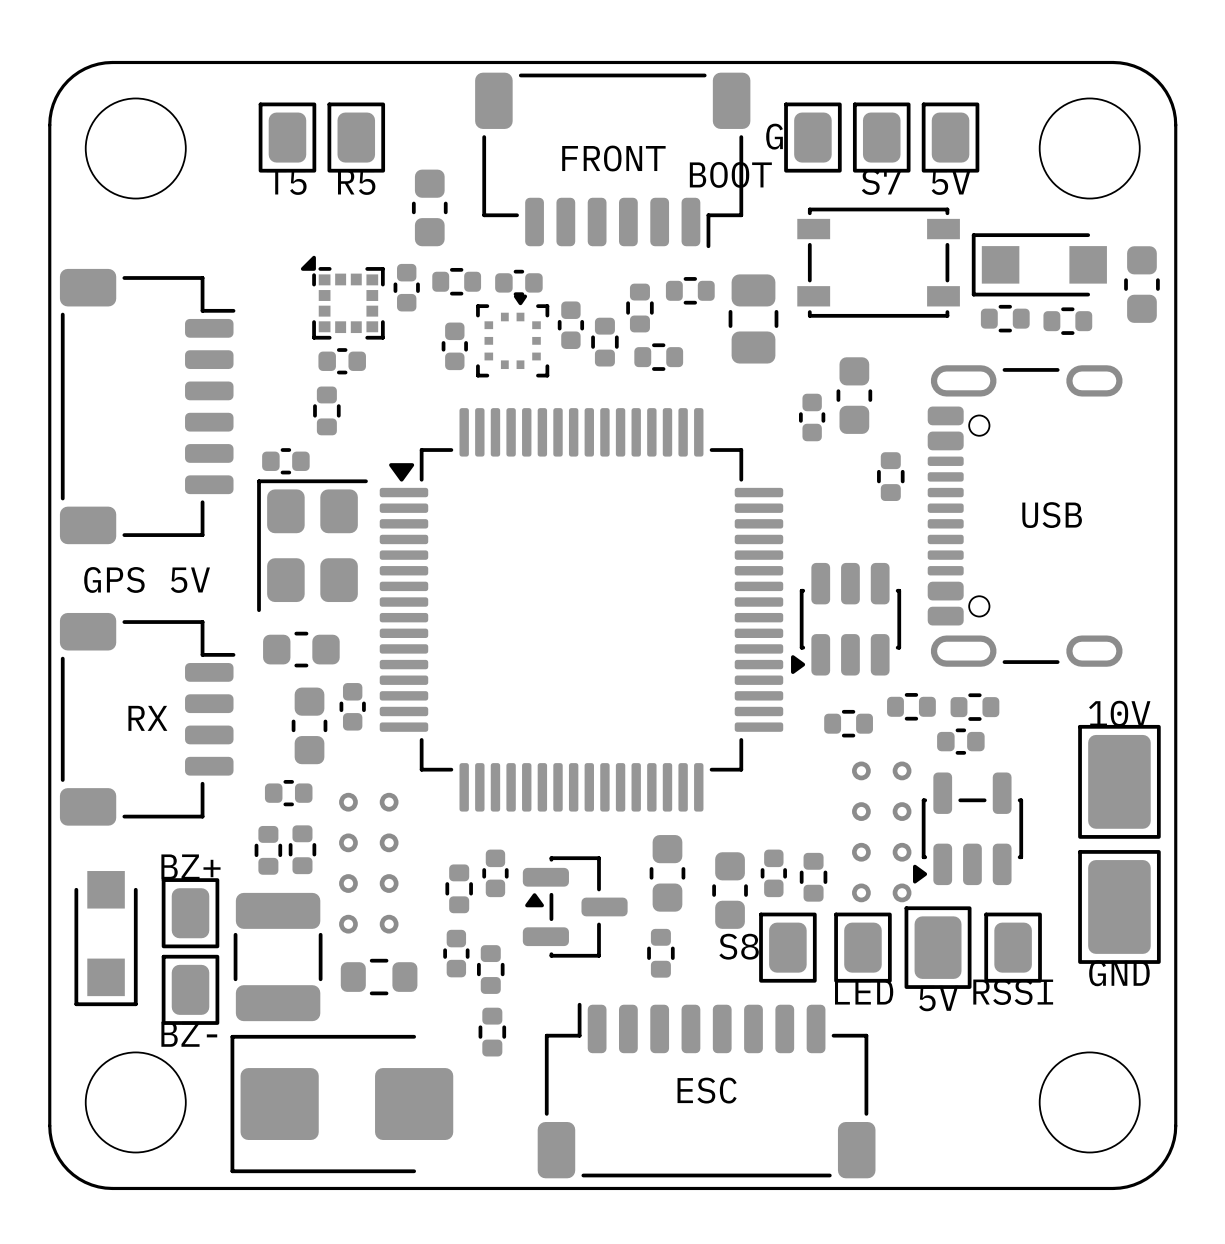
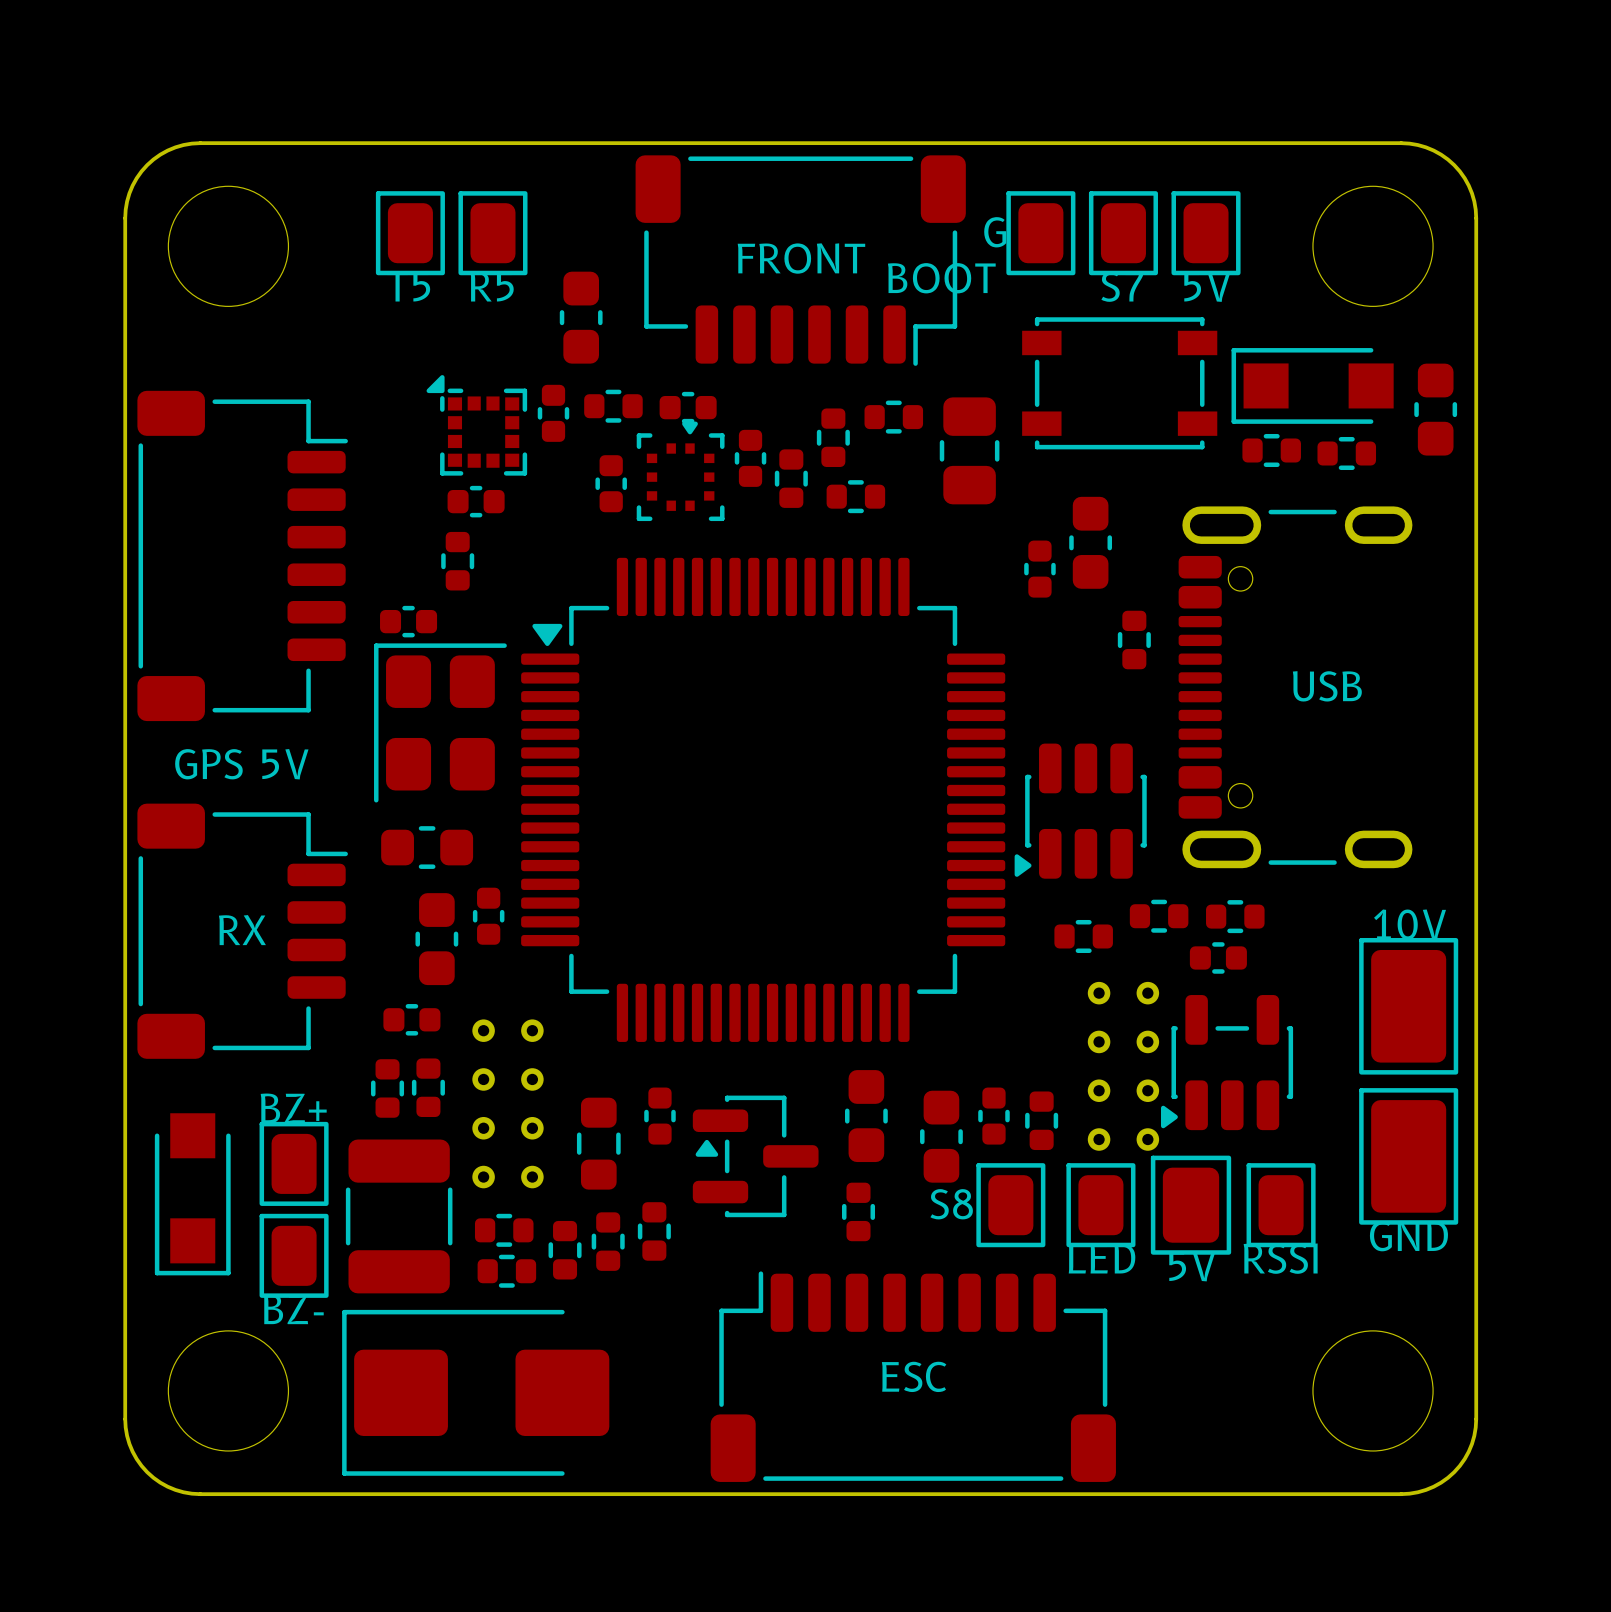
part footprint: [445, 864, 473, 914] -> [576, 1097, 621, 1190]
part footprint: [443, 929, 470, 978] -> [591, 1212, 625, 1271]
part: none -> (504, 1230)
part: (379, 977) -> none
part: none -> (565, 1250)
part: none -> (506, 1271)
part: (492, 1032) -> none

